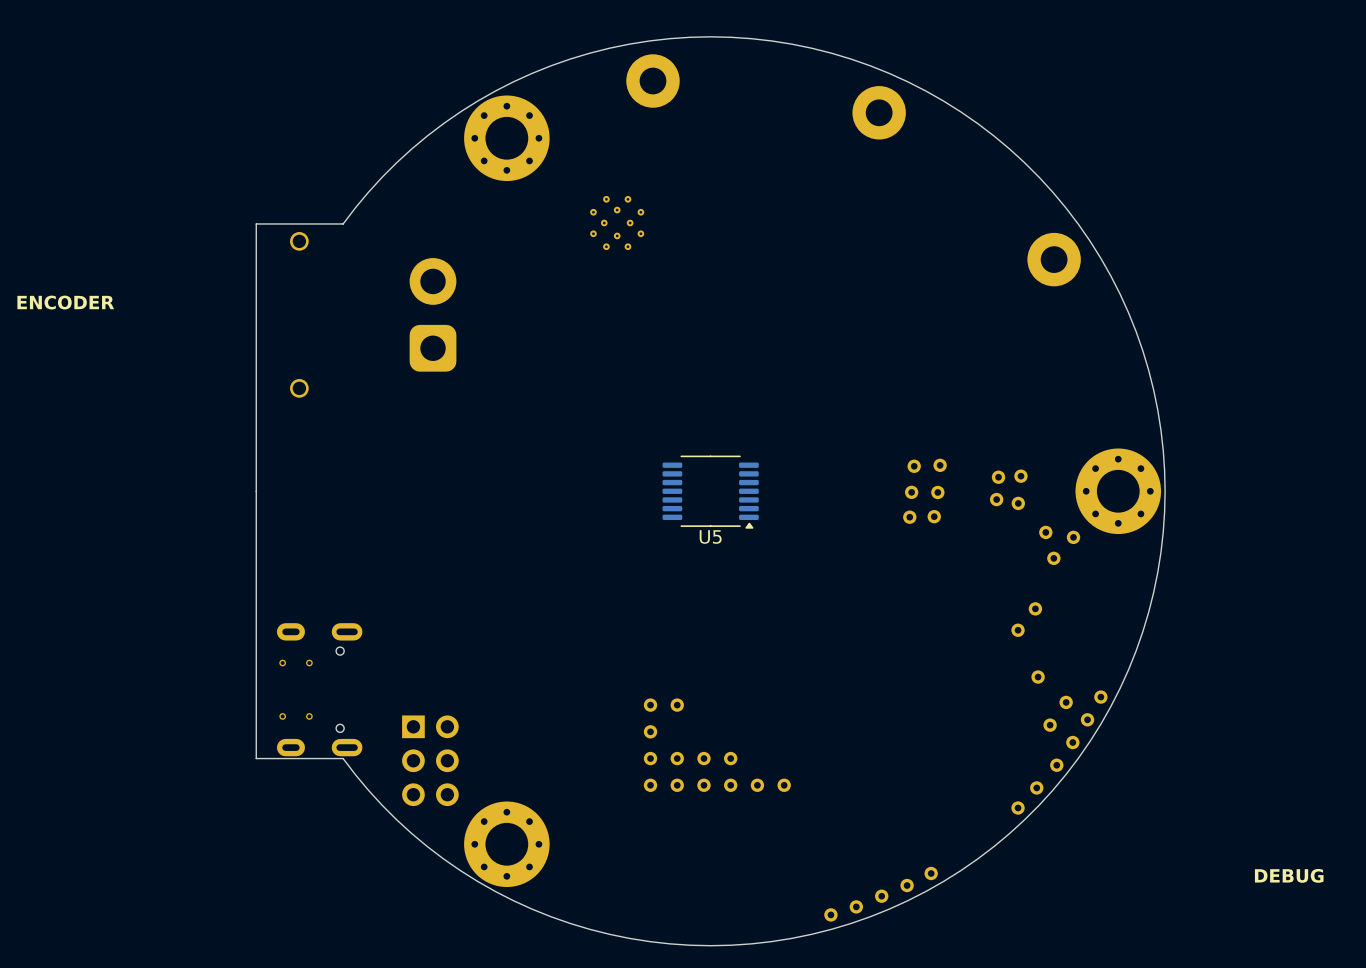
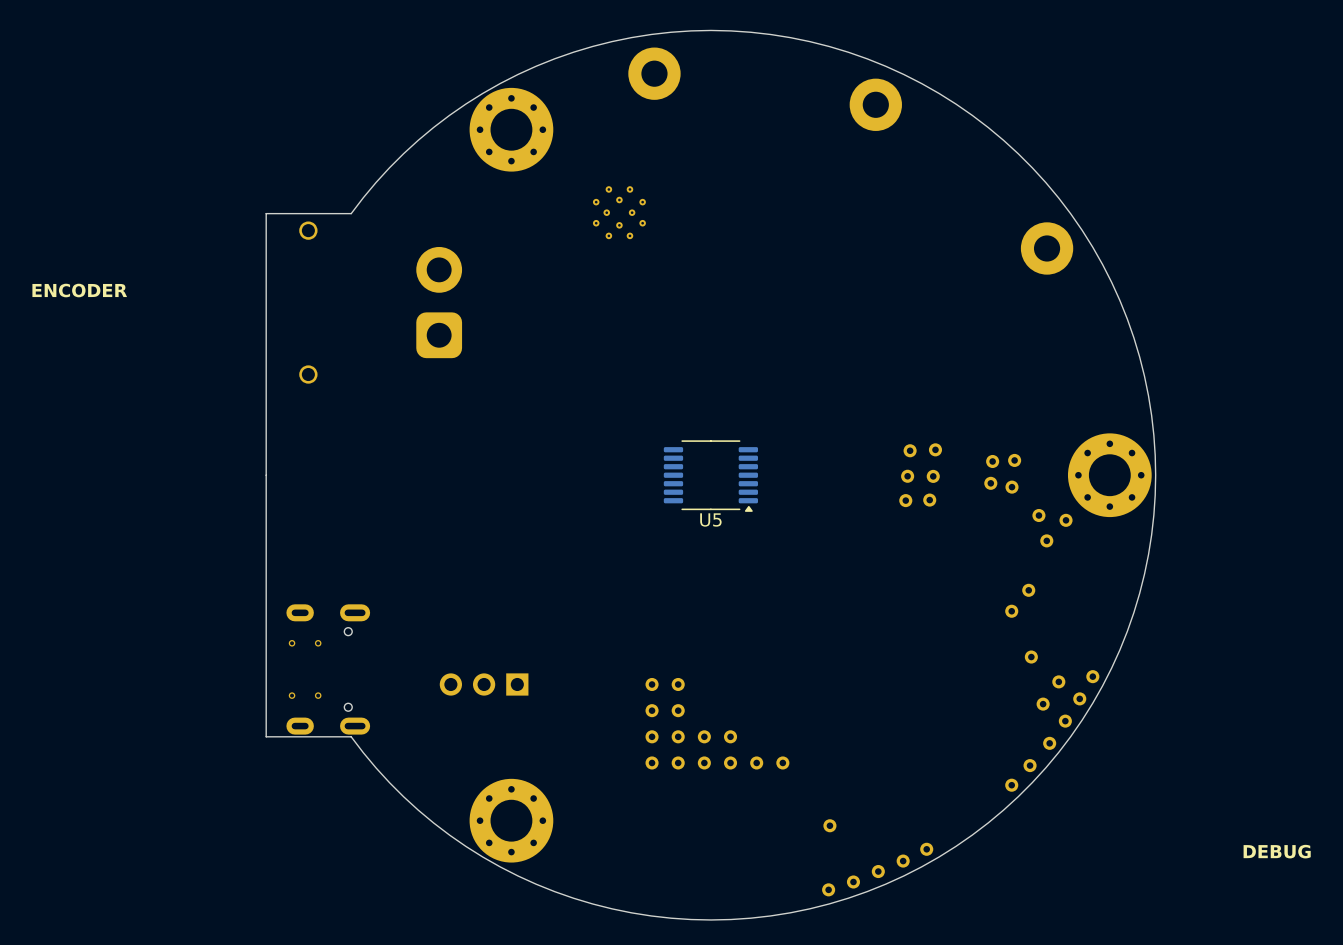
part: none -> (484, 684)
part: none -> (678, 710)
part: (430, 760) -> none
part: none -> (829, 825)

